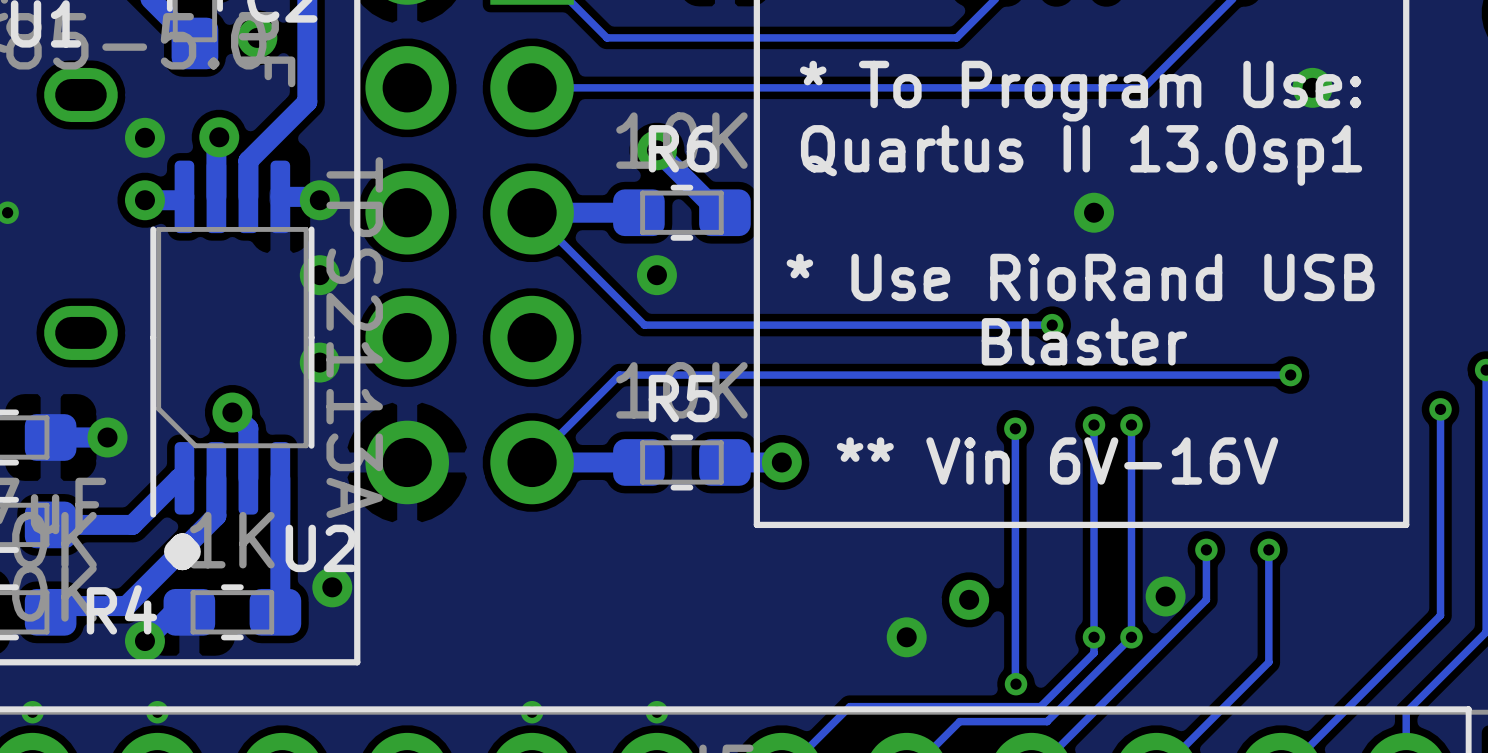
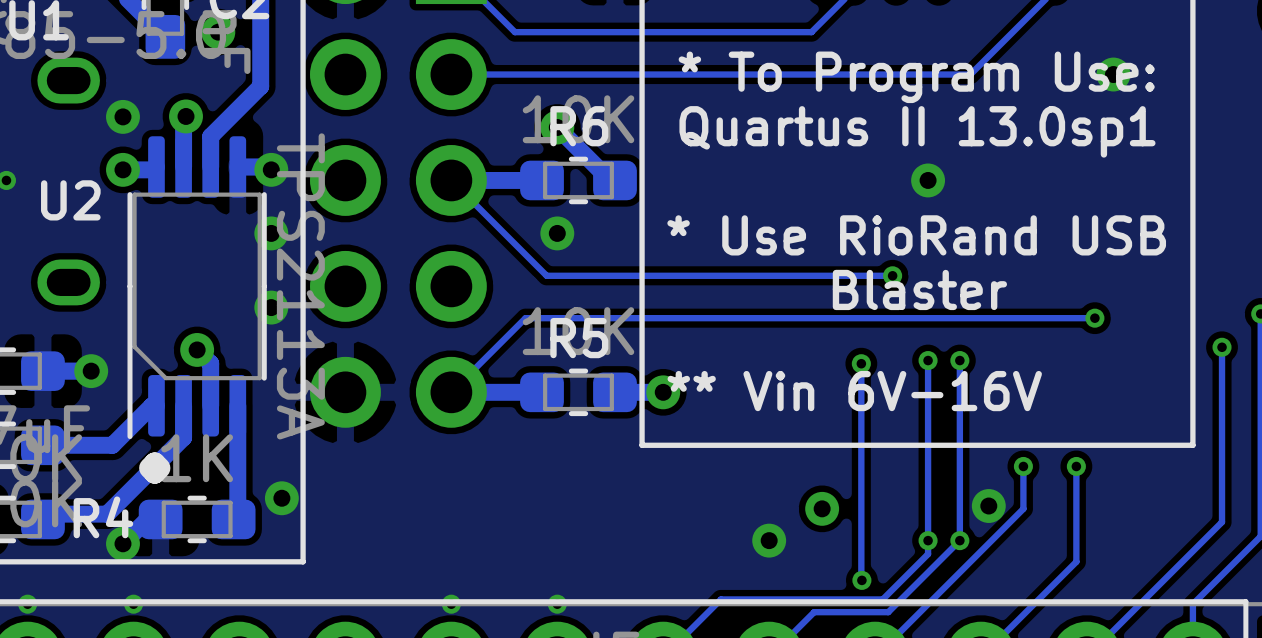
text position: ** Vin 6V-16V (1057, 460) -> ** Vin 6V-16V (854, 391)
U2 name position: U2 (320, 548) -> U2 (70, 200)

